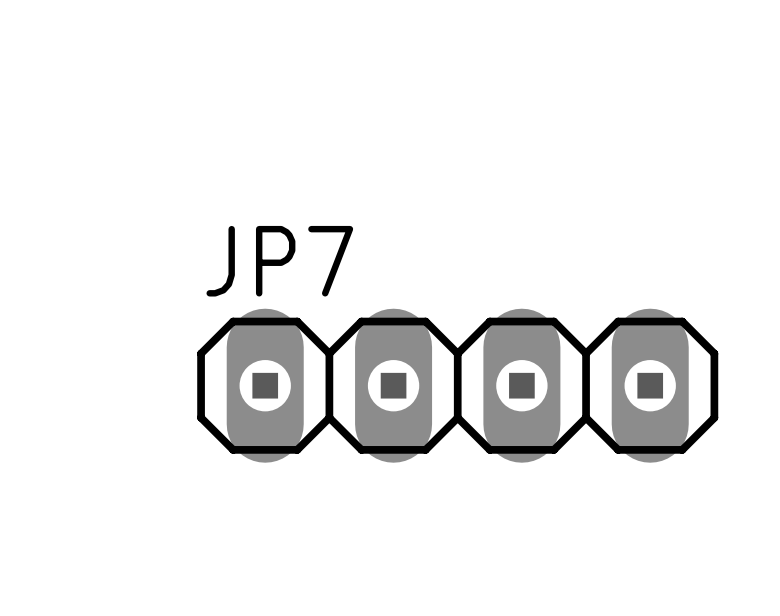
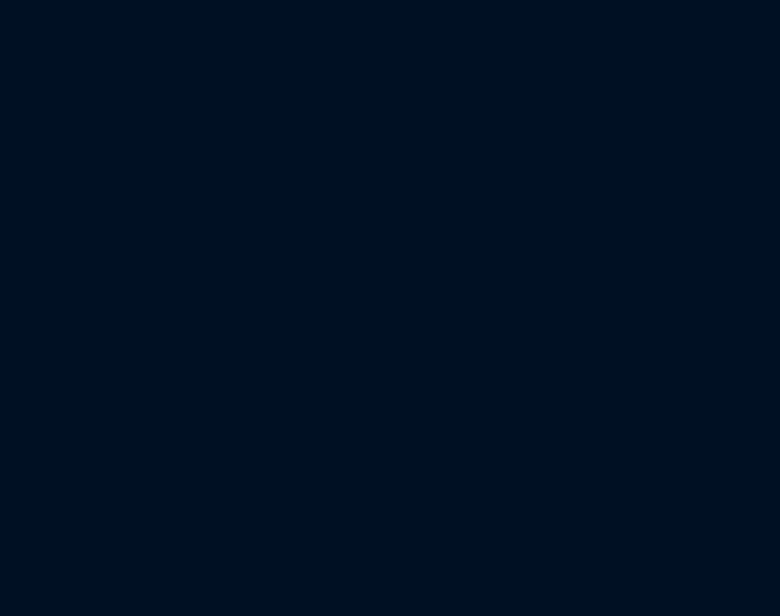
JP7: (457, 385) -> none

